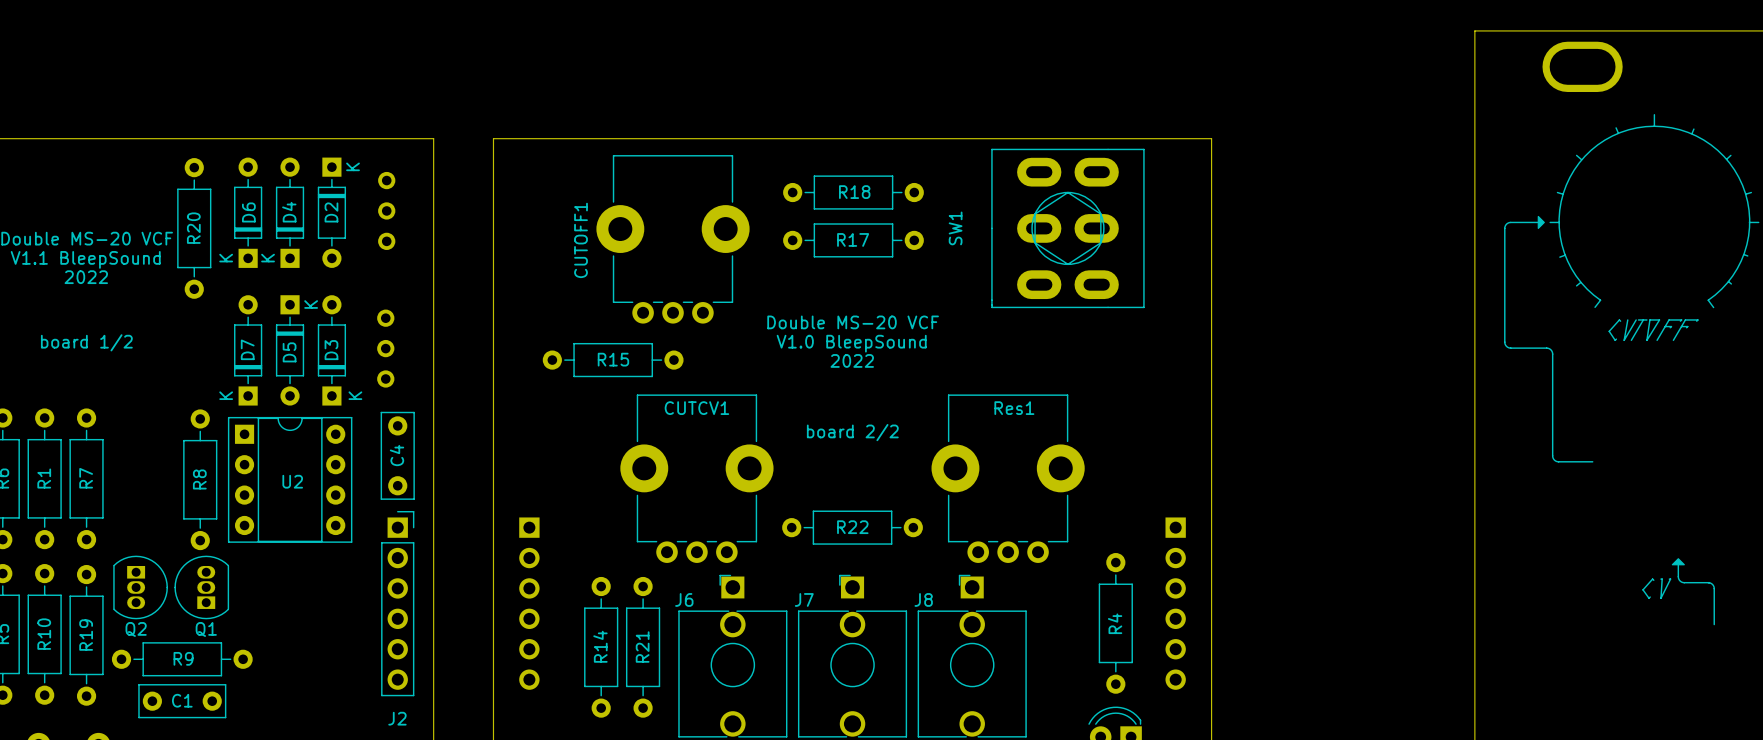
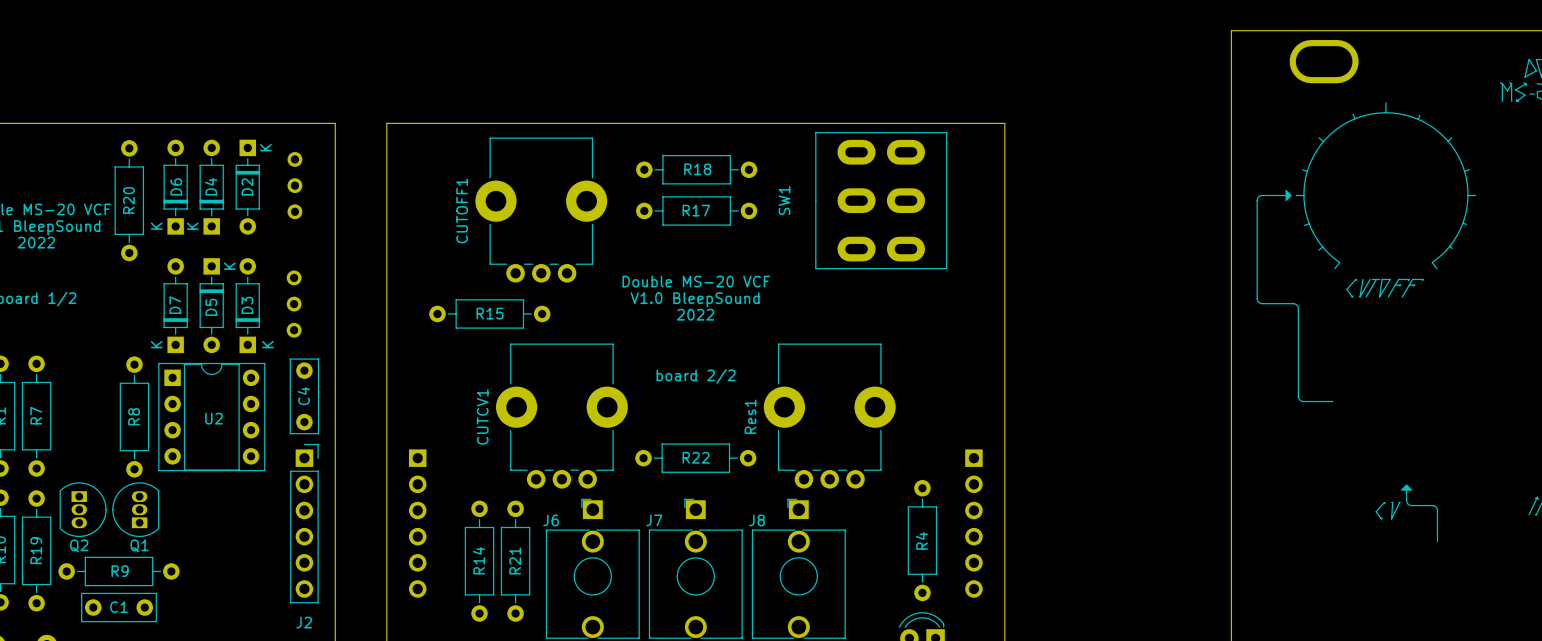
SW1 footprint: [991, 148, 1145, 309] -> [815, 132, 948, 270]
CUTCV1 name rotation: 0° (696, 408) -> 90° counterclockwise (482, 416)
CUTCV1 name position: CUTCV1 (696, 408) -> CUTCV1 (482, 416)
Res1 name rotation: 0° (1014, 408) -> 90° counterclockwise (750, 416)
Res1 name position: Res1 (1014, 408) -> Res1 (750, 416)

